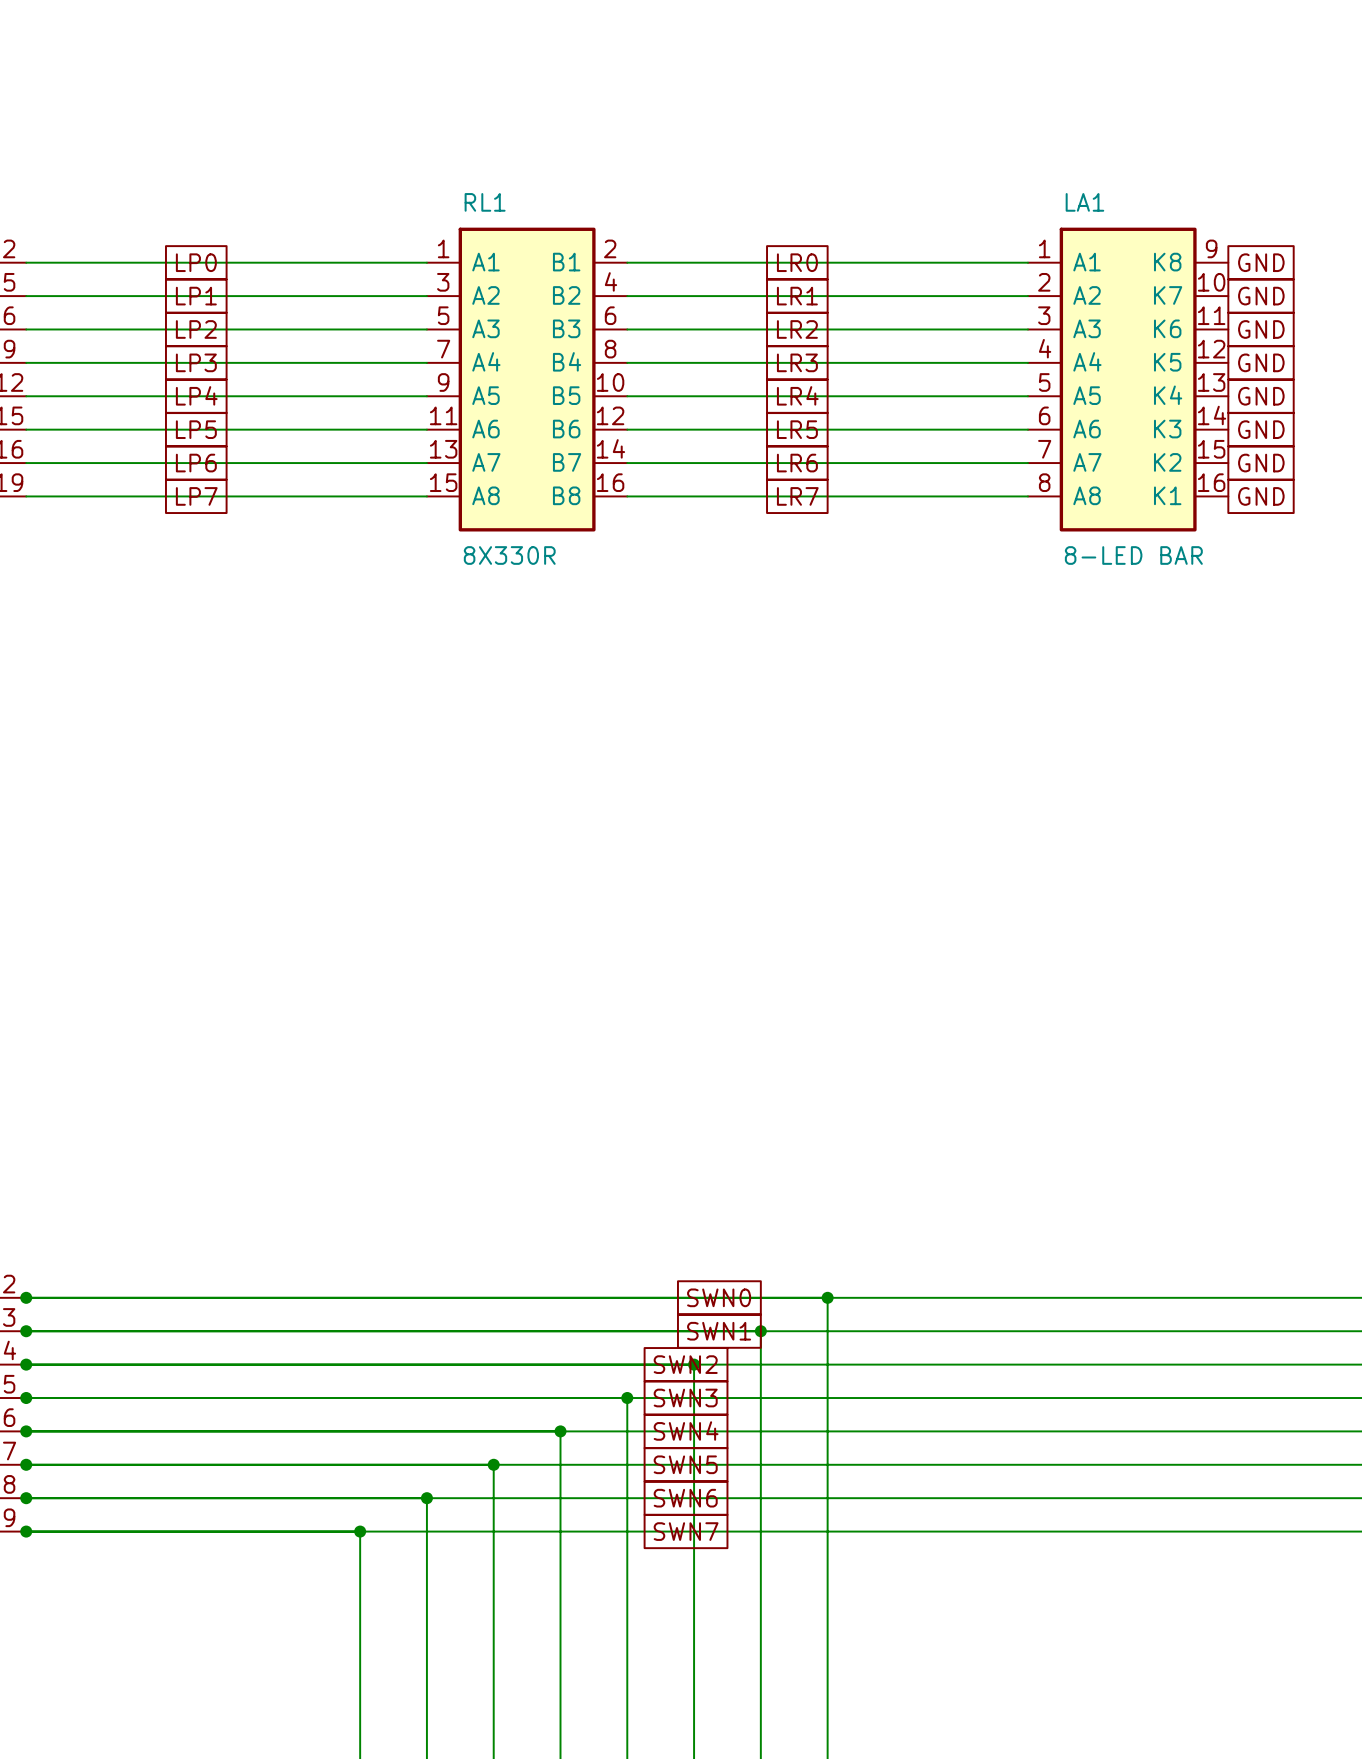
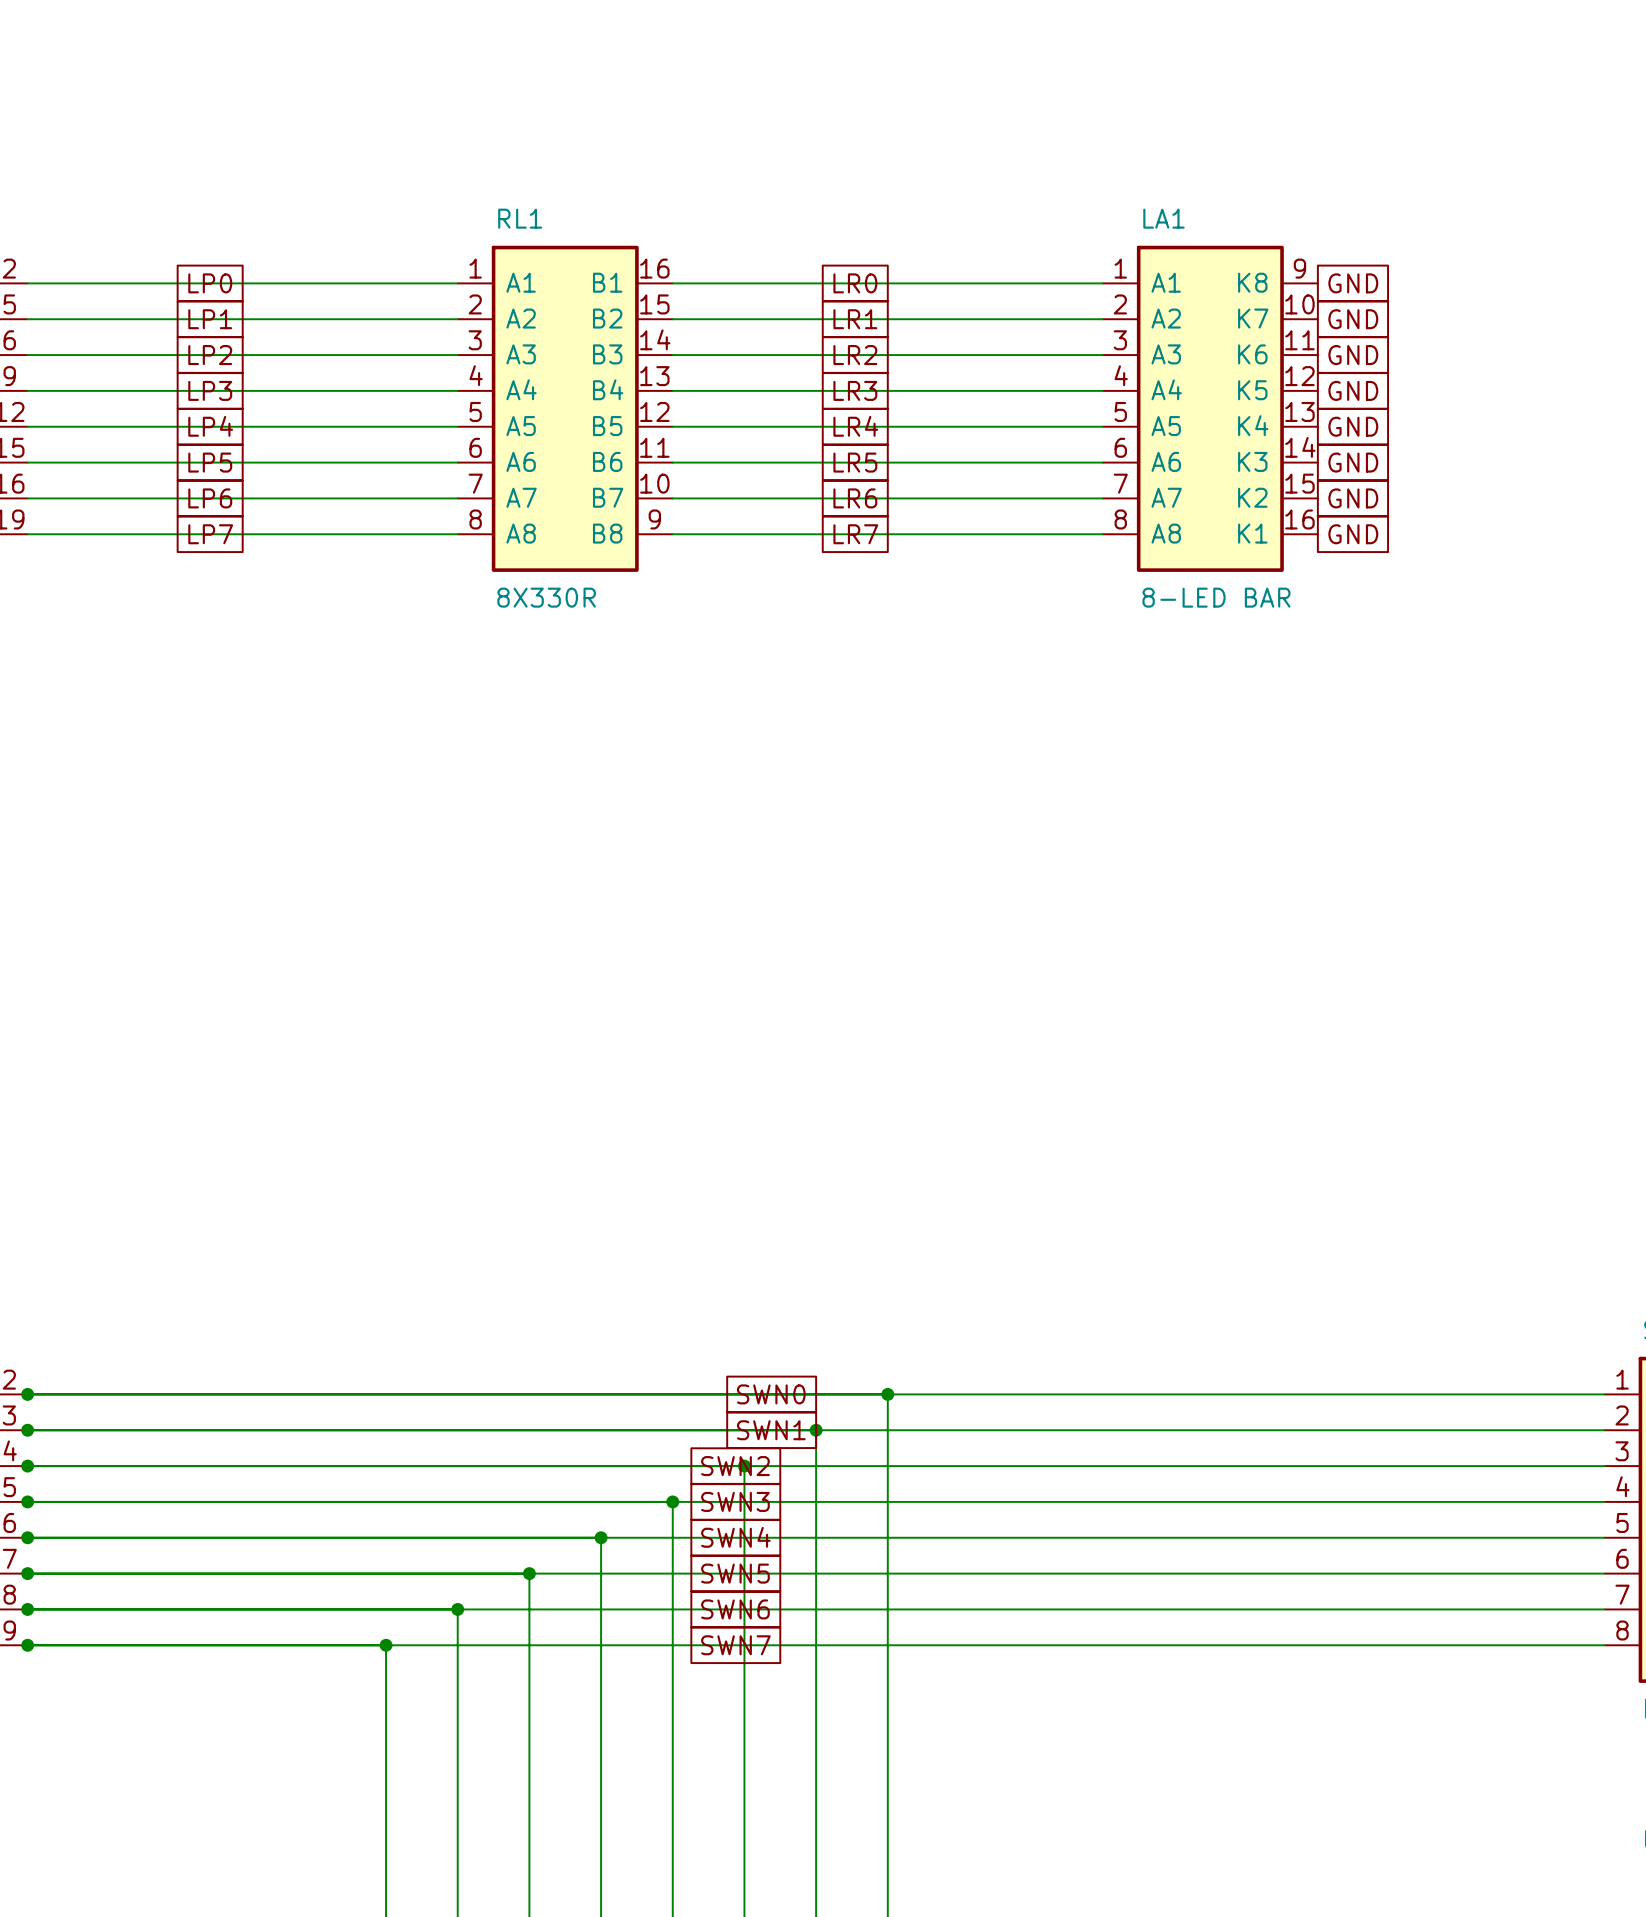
RL1 symbol: [426, 227, 628, 532] -> [457, 245, 673, 572]

